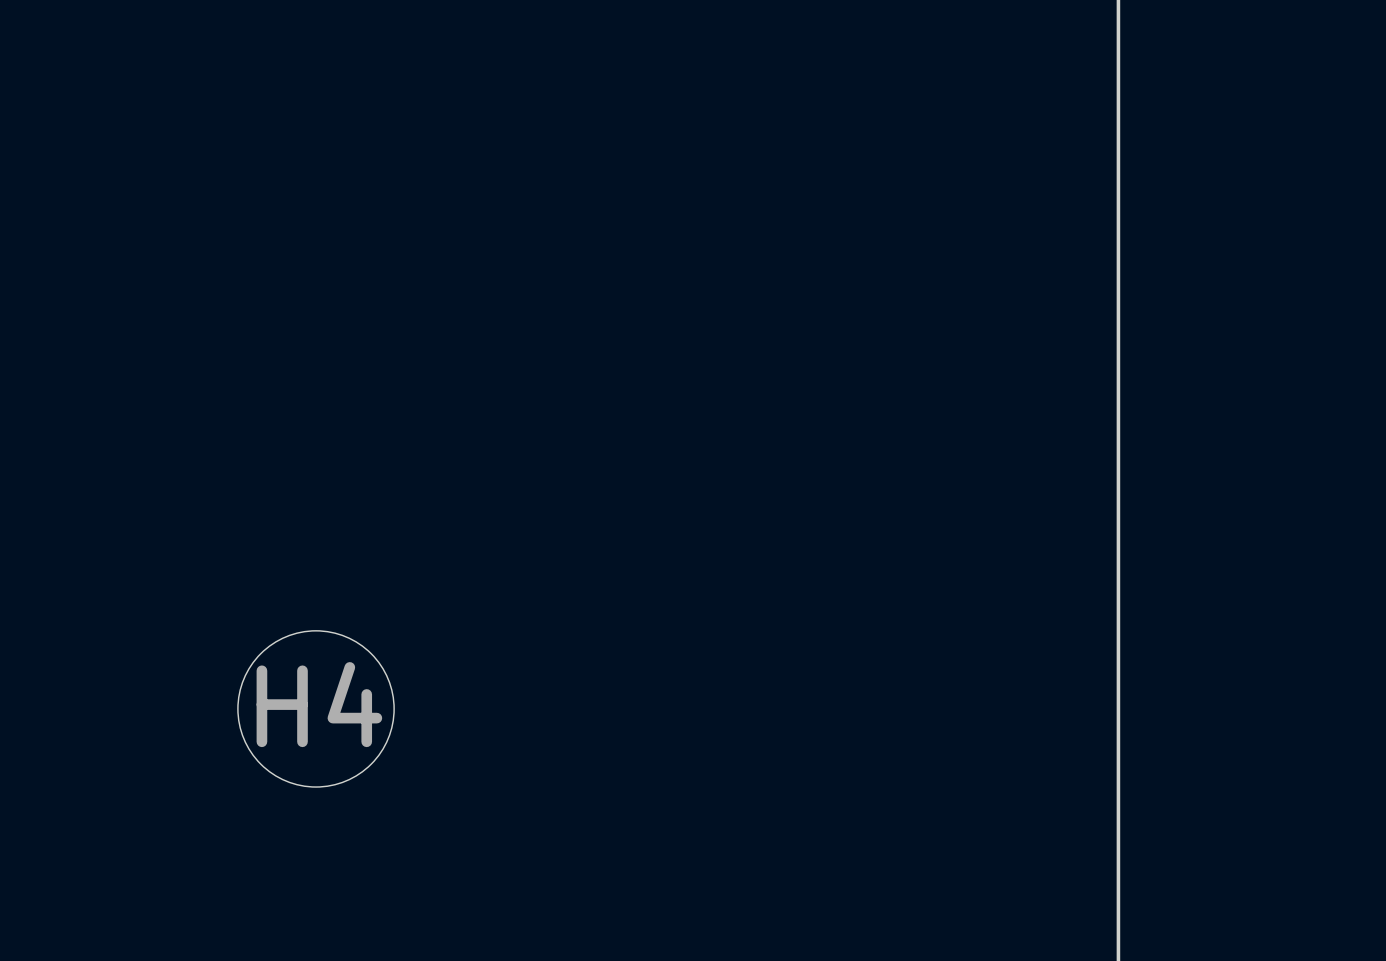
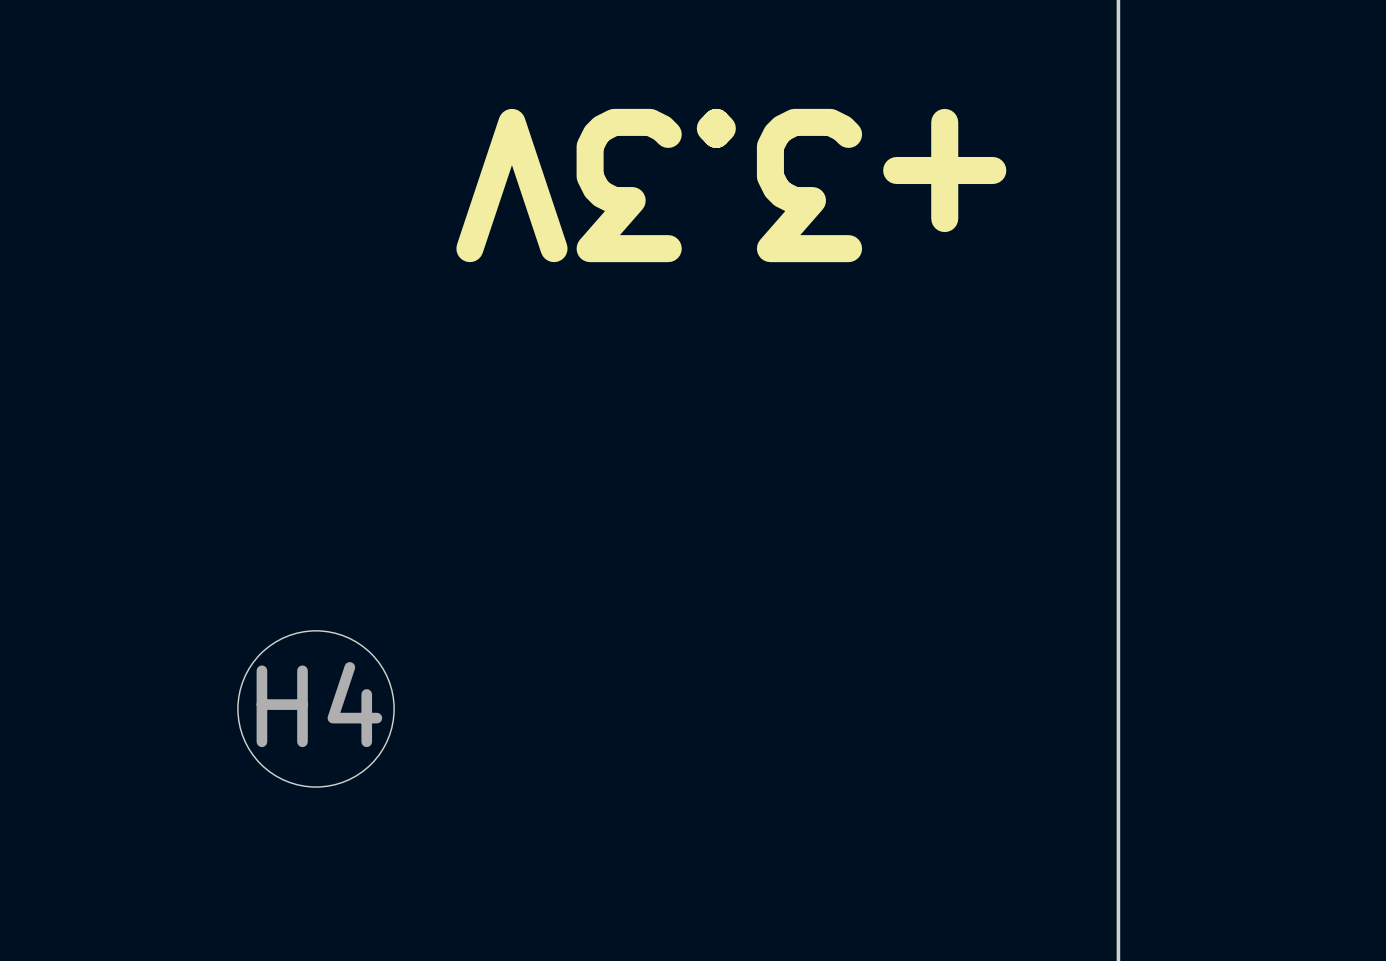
text: none -> +3.3V (731, 185)

